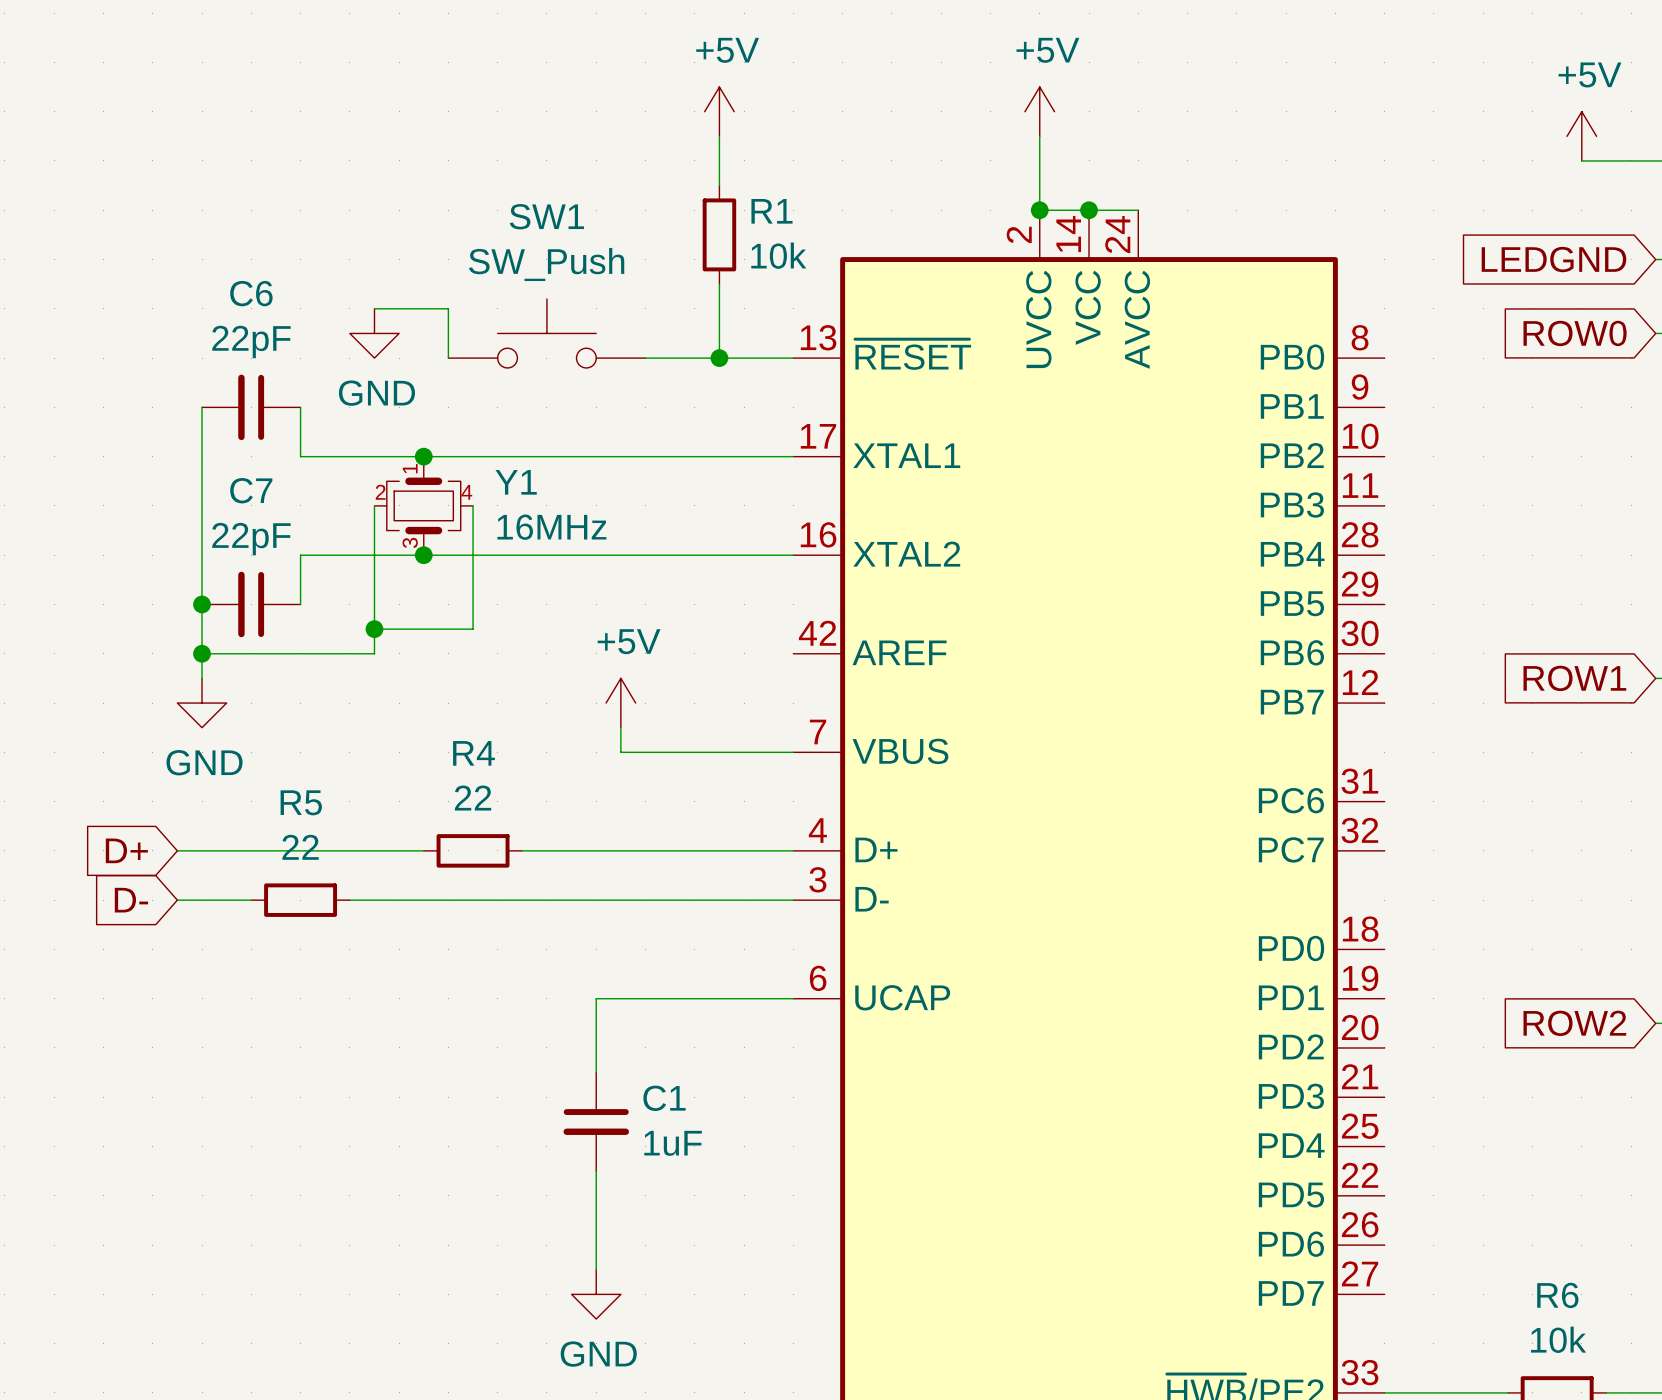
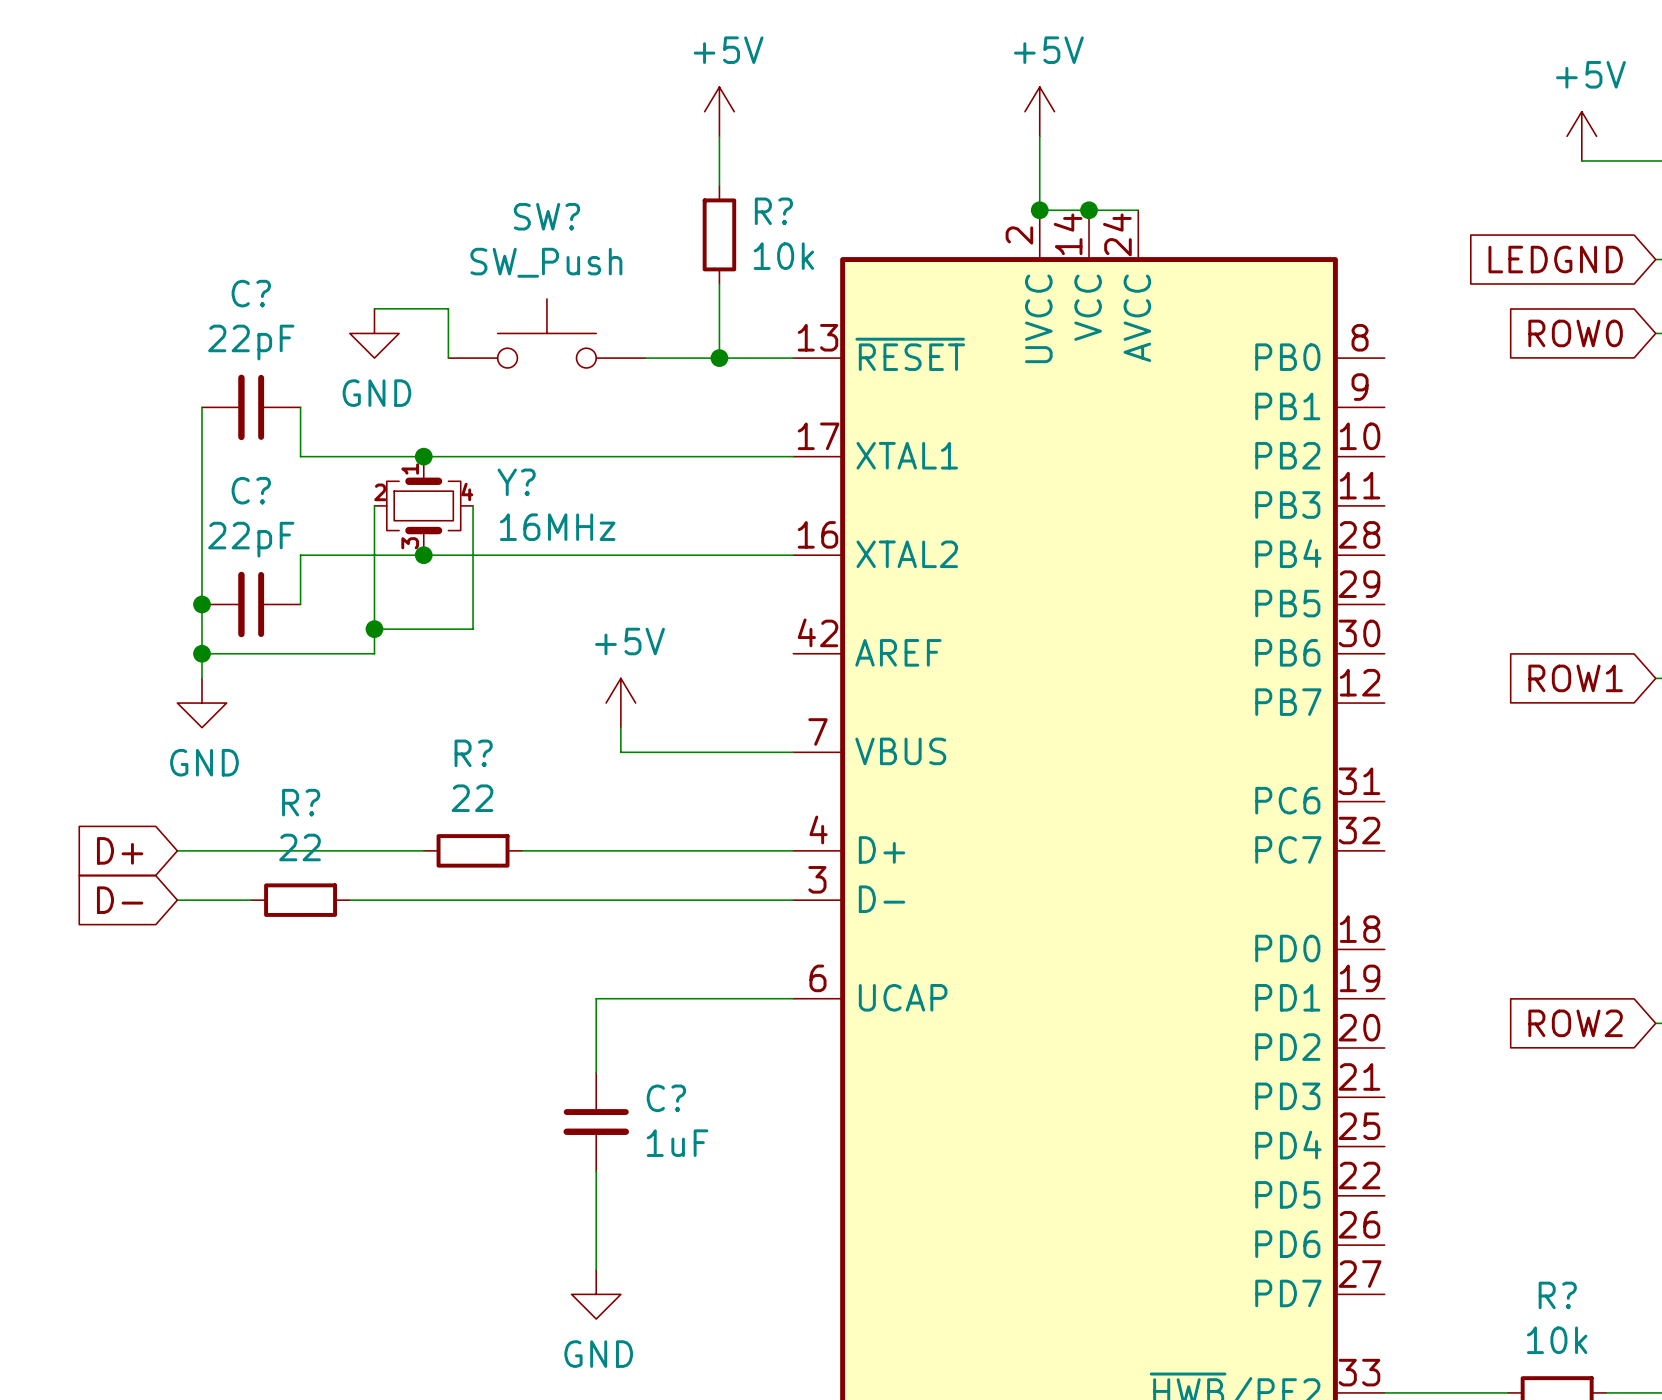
R1 name: R1 (771, 211) -> R? (773, 211)
SW1 name: SW1 (546, 216) -> SW? (546, 216)
C6 name: C6 (251, 293) -> C? (251, 293)
Y1 name: Y1 (516, 482) -> Y? (516, 482)
C7 name: C7 (251, 490) -> C? (251, 490)
R4 name: R4 (473, 753) -> R? (473, 753)
R5 name: R5 (301, 802) -> R? (301, 802)
C1 name: C1 (664, 1098) -> C? (666, 1098)
R6 name: R6 (1557, 1295) -> R? (1557, 1295)

